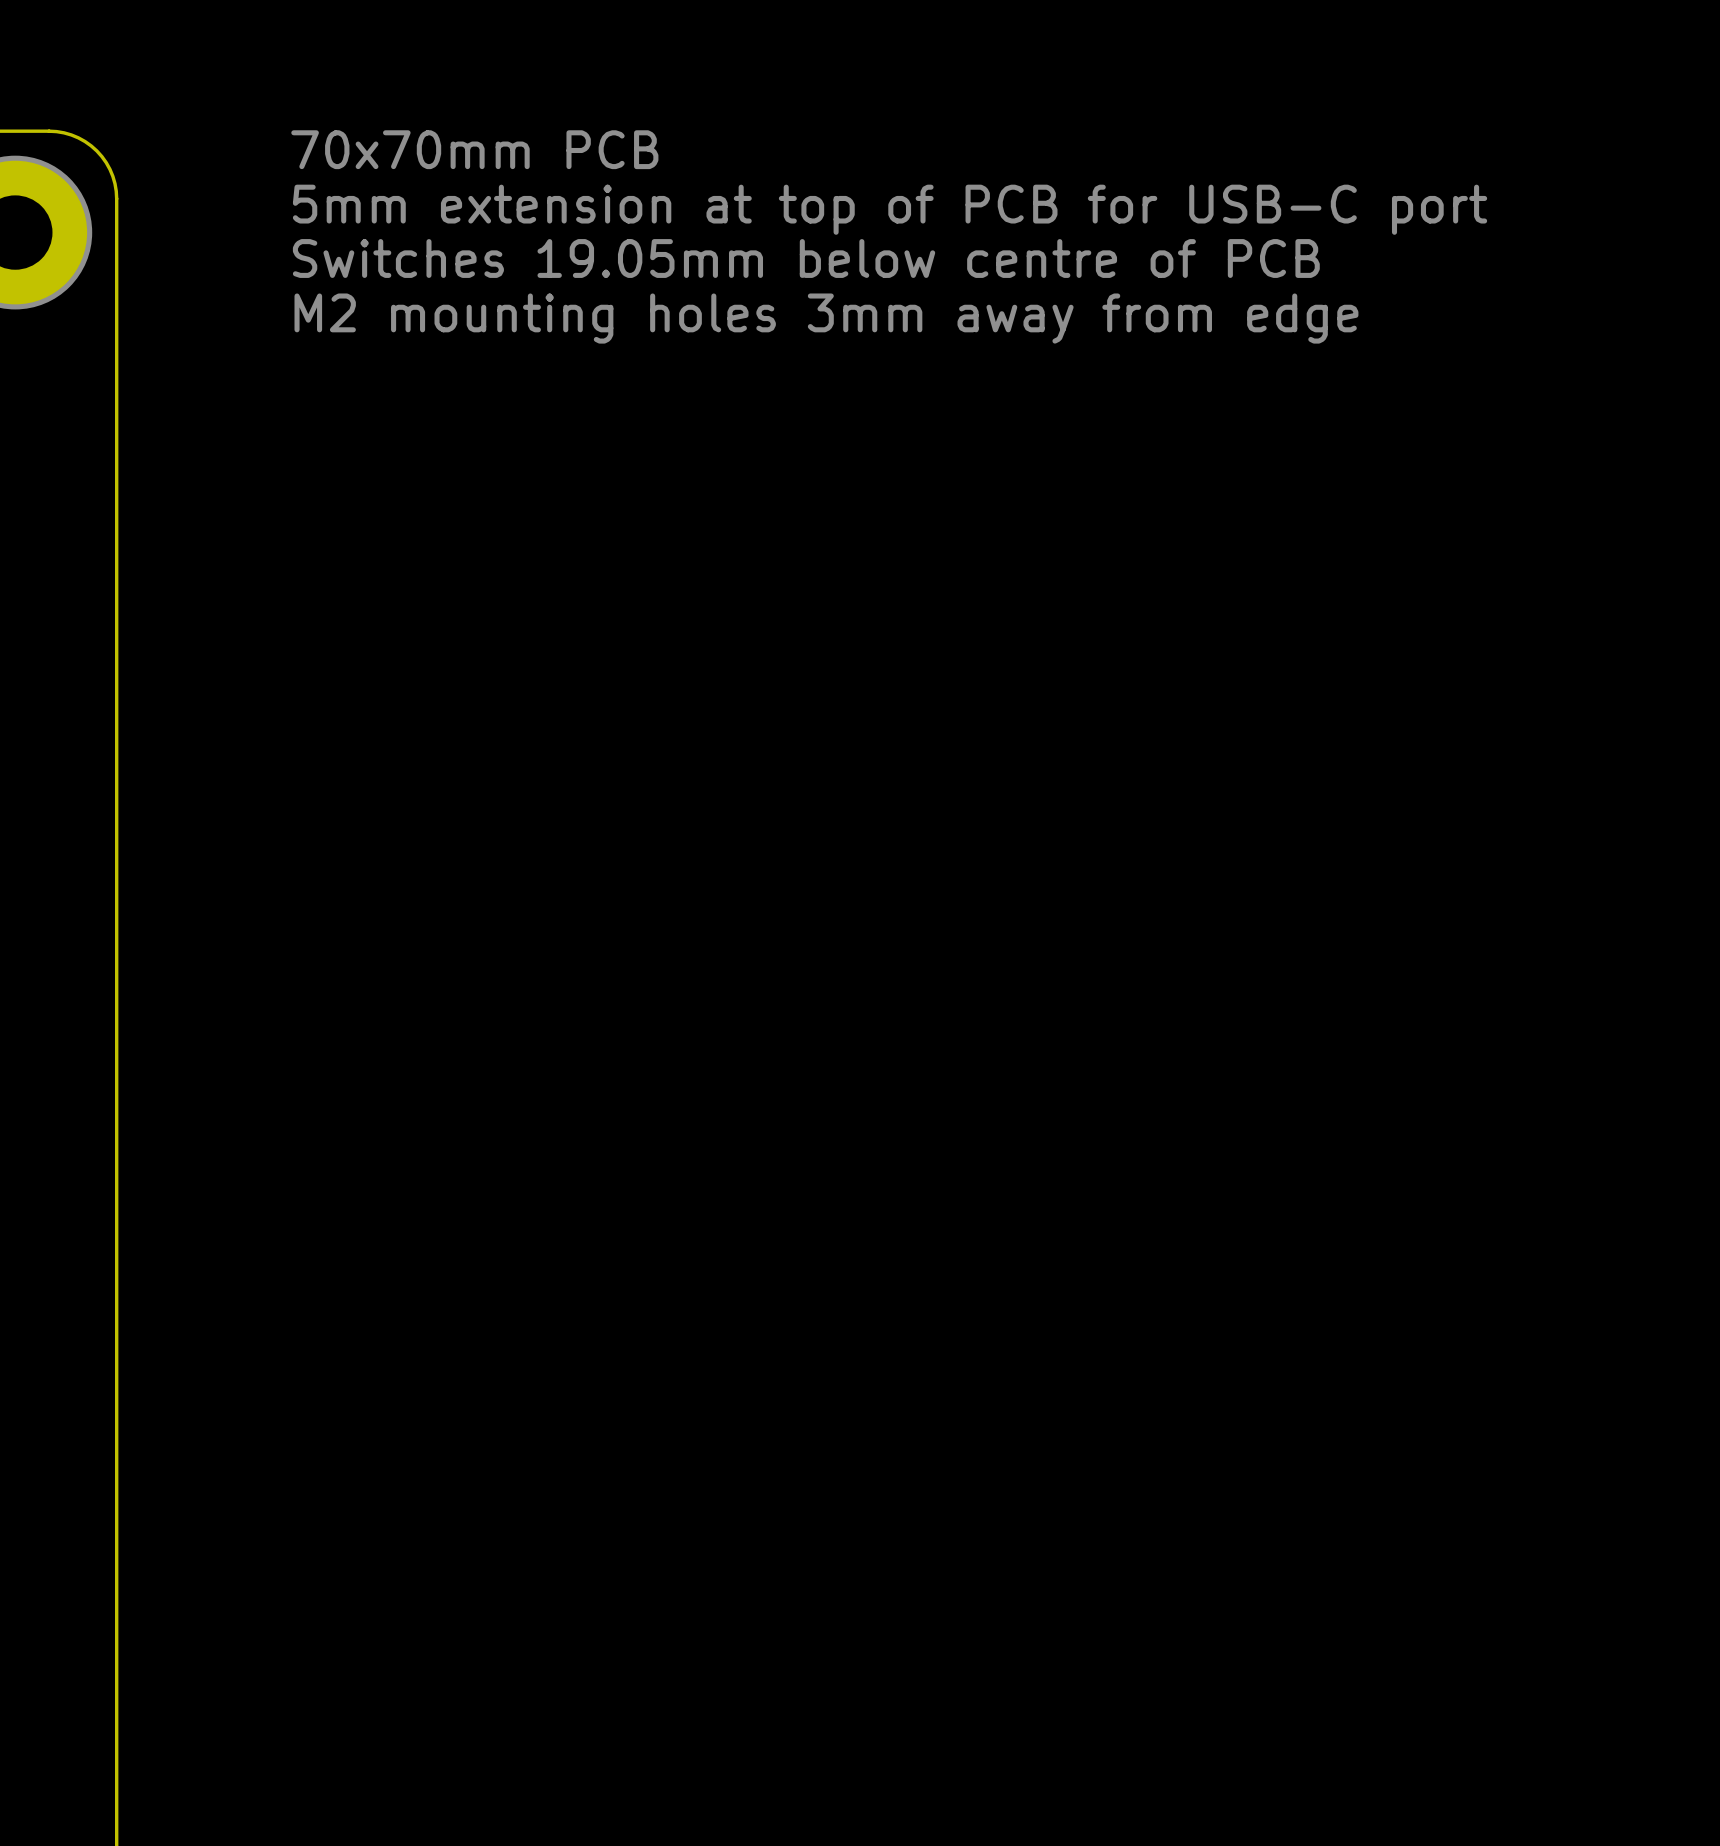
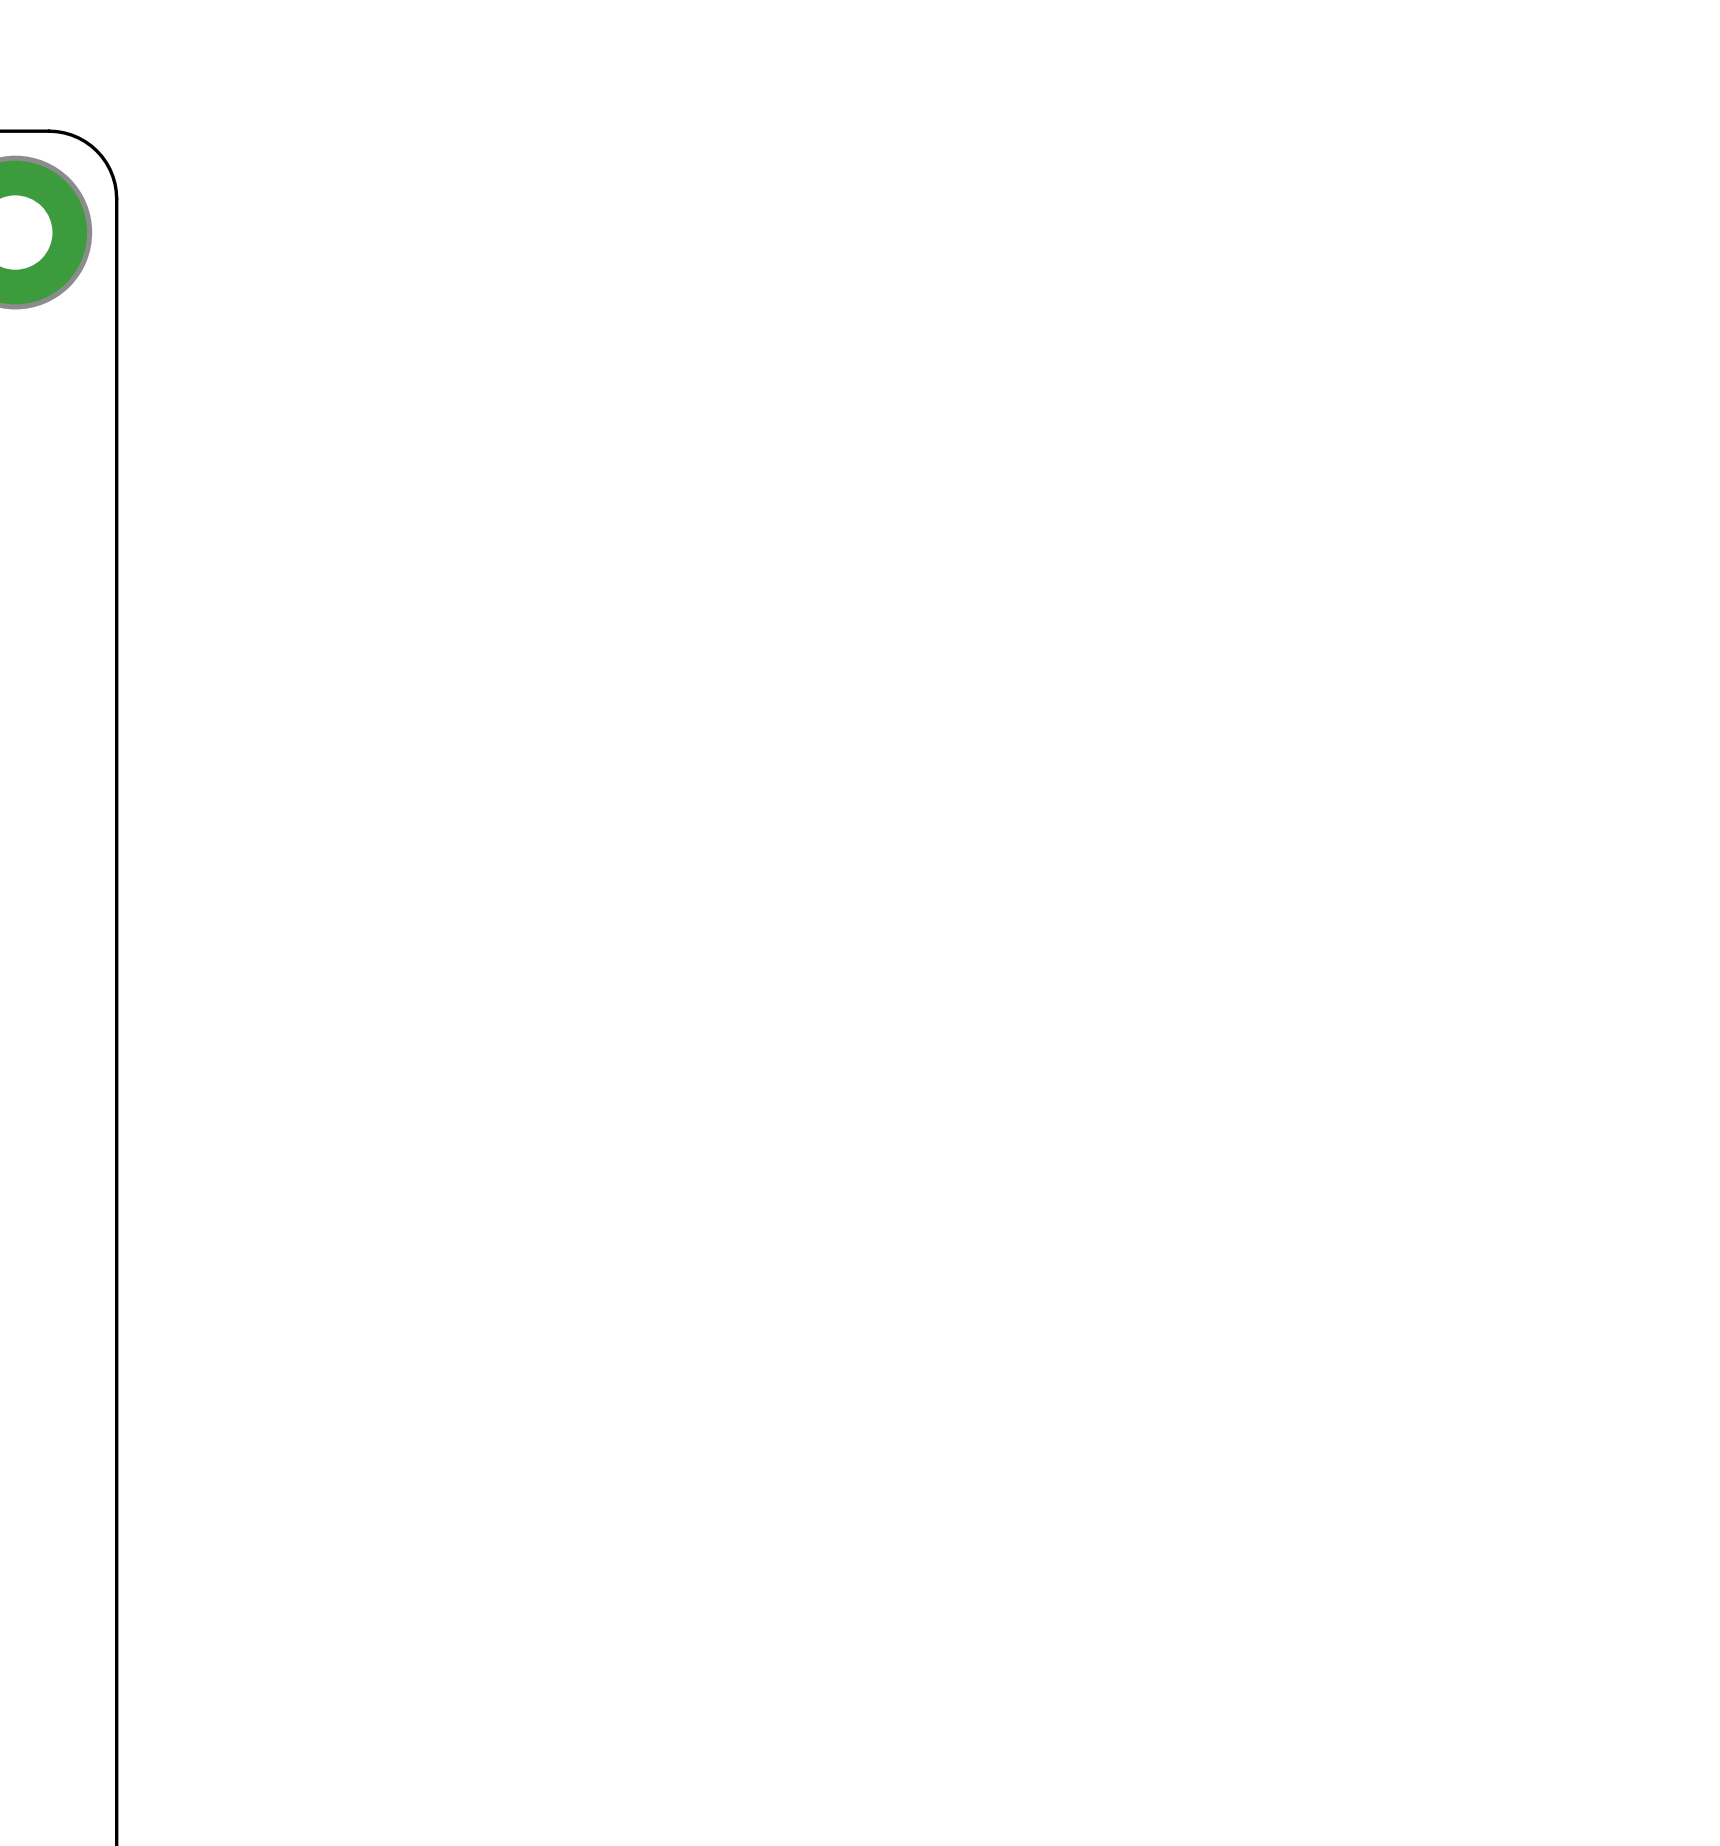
text: 70x70mm PCB (474, 149) -> none
text: 5mm extension at top of PCB for USB-C port (890, 209) -> none
text: Switches 19.05mm below centre of PCB (806, 258) -> none
text: M2 mounting holes 3mm away from edge (826, 318) -> none

